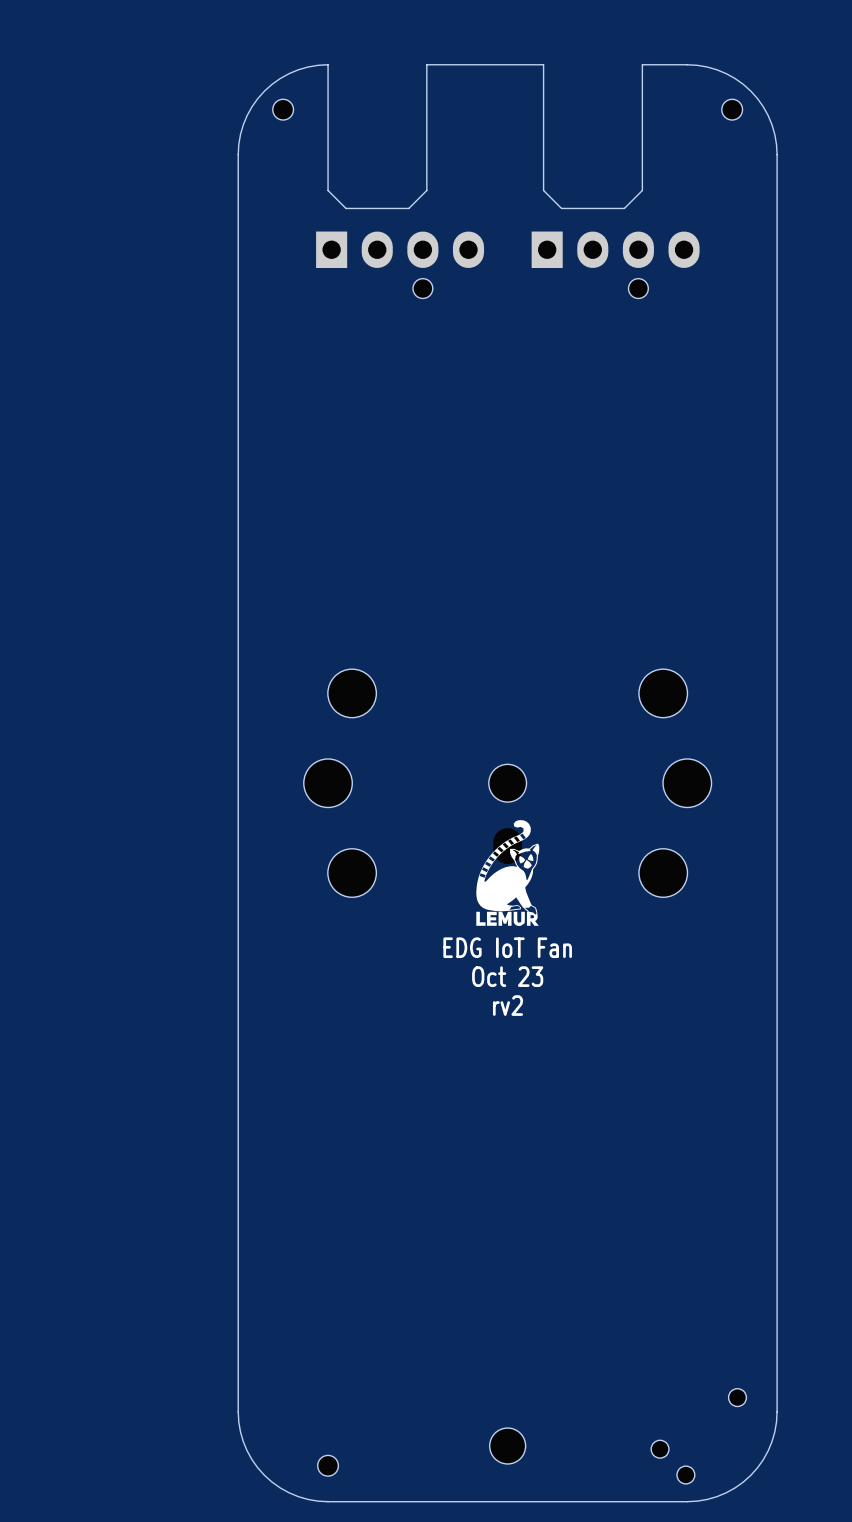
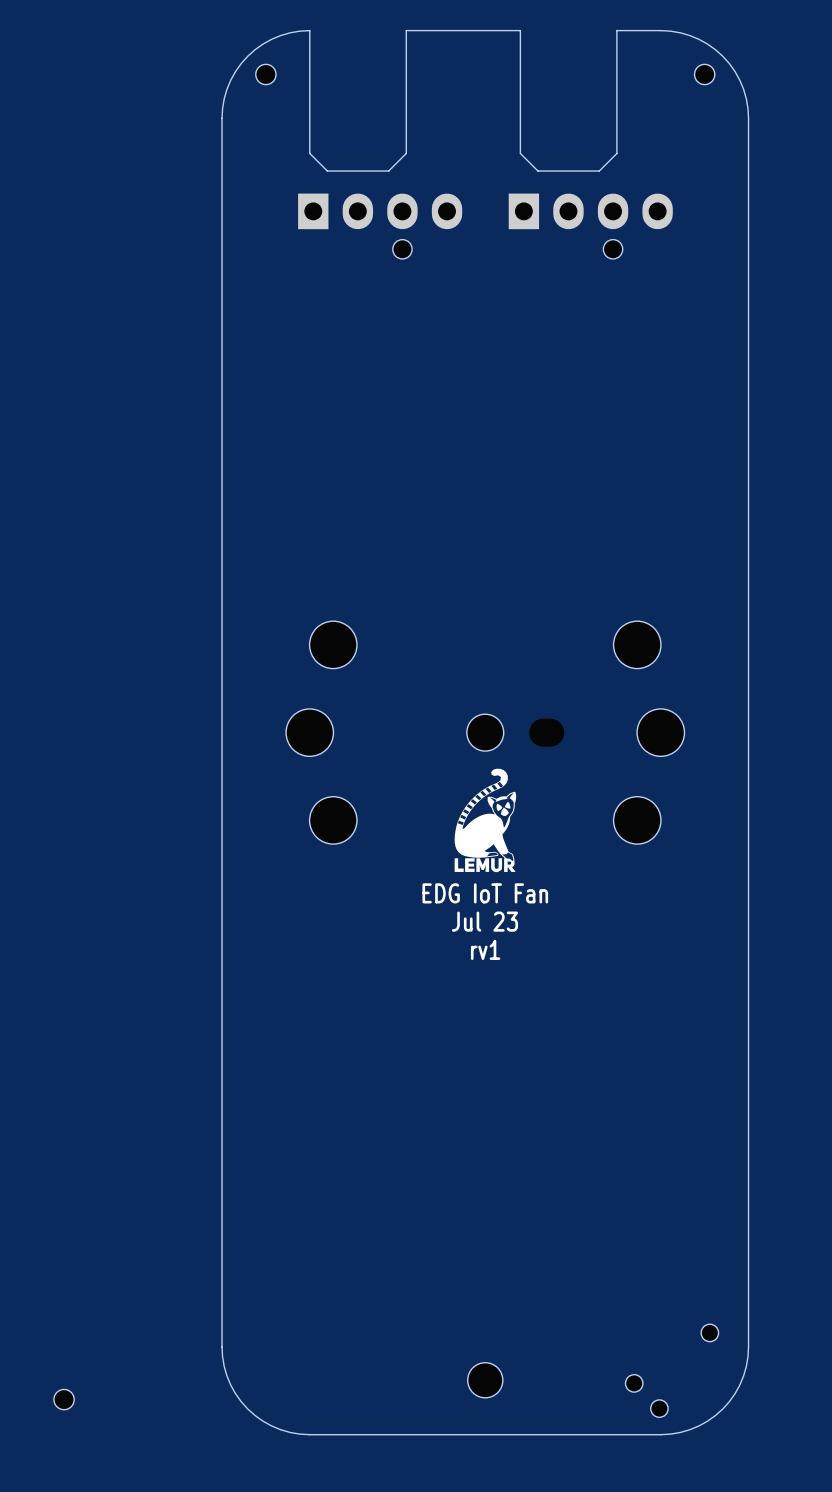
part rotation: 0° (507, 814) -> 90° counterclockwise (515, 732)
text: Oct 23 (507, 976) -> Jul 23 (484, 921)
text: rv2 (508, 1005) -> rv1 (485, 949)
part position: (328, 1465) -> (64, 1399)

